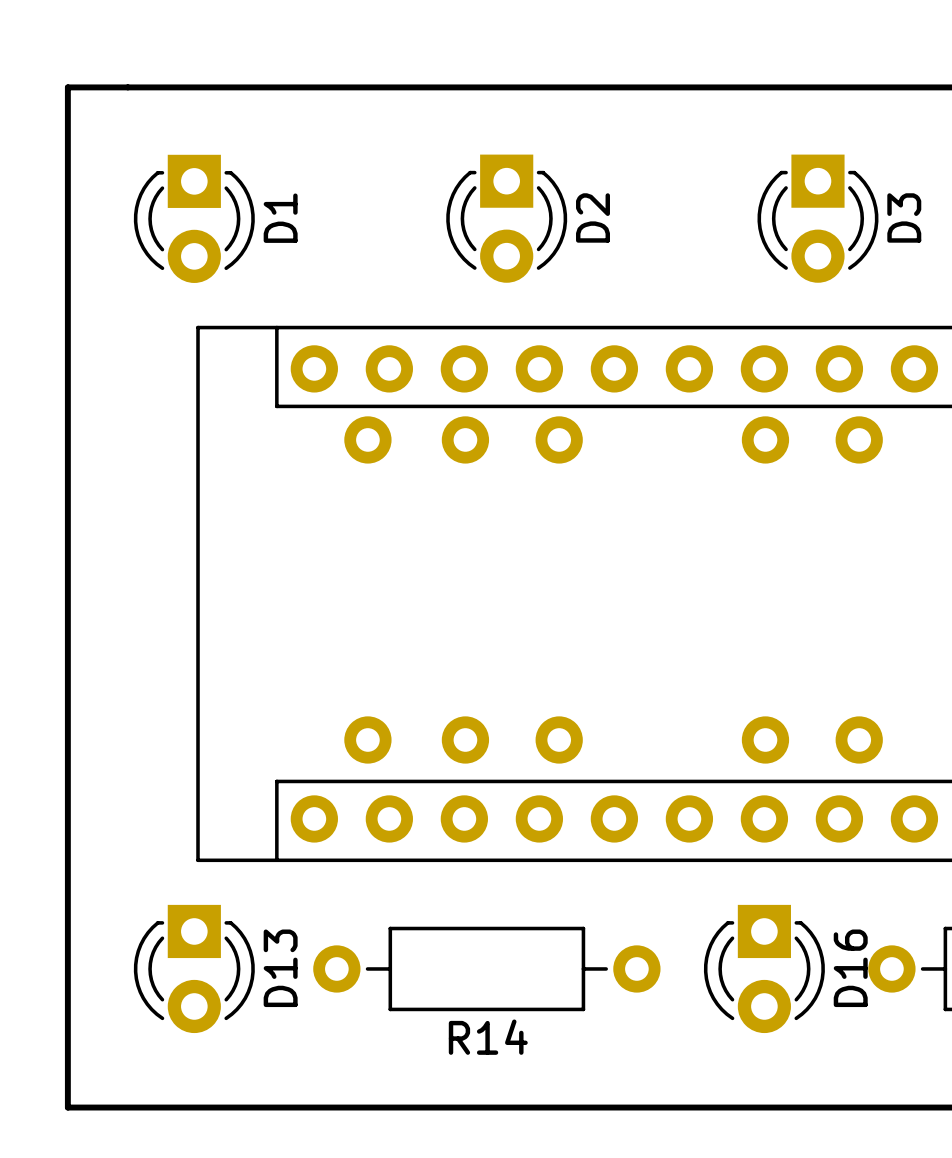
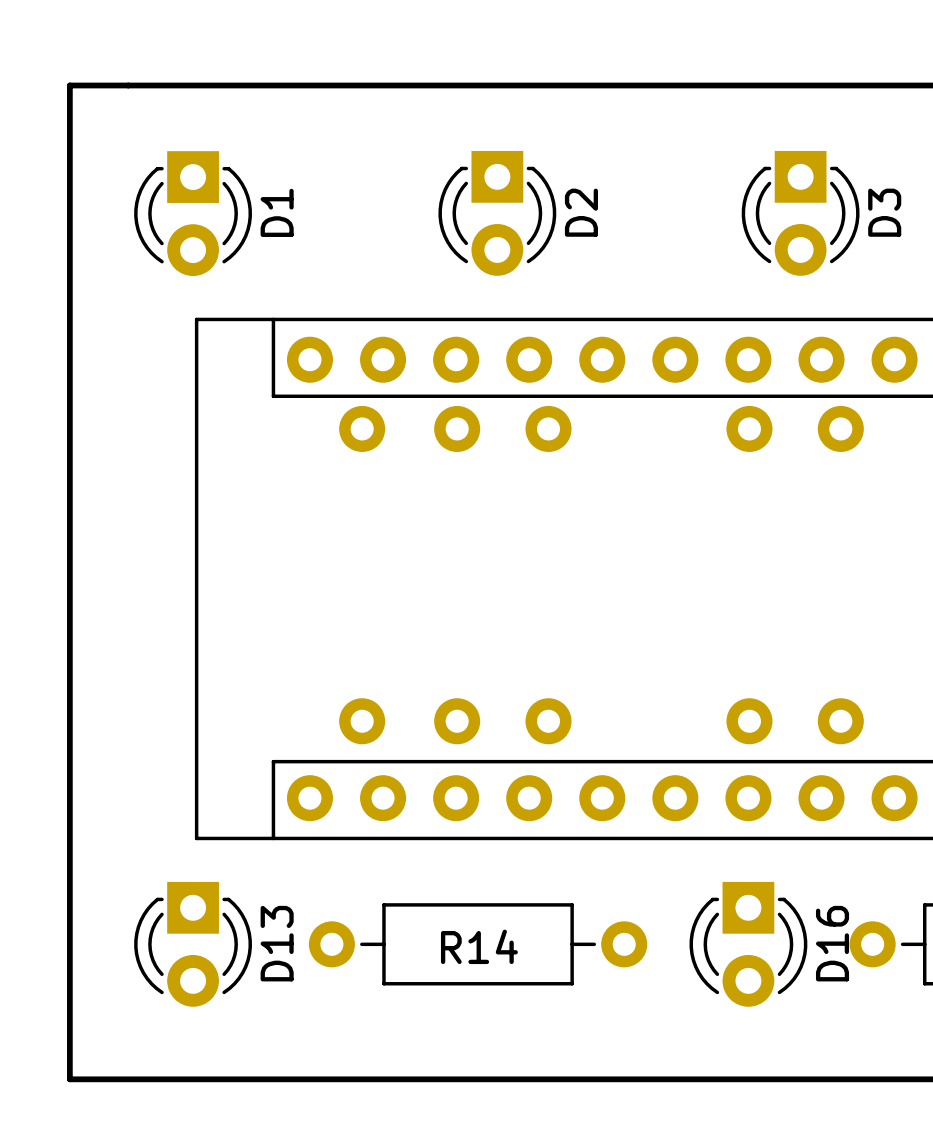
R14 name position: R14 (488, 1037) -> R14 (479, 946)

